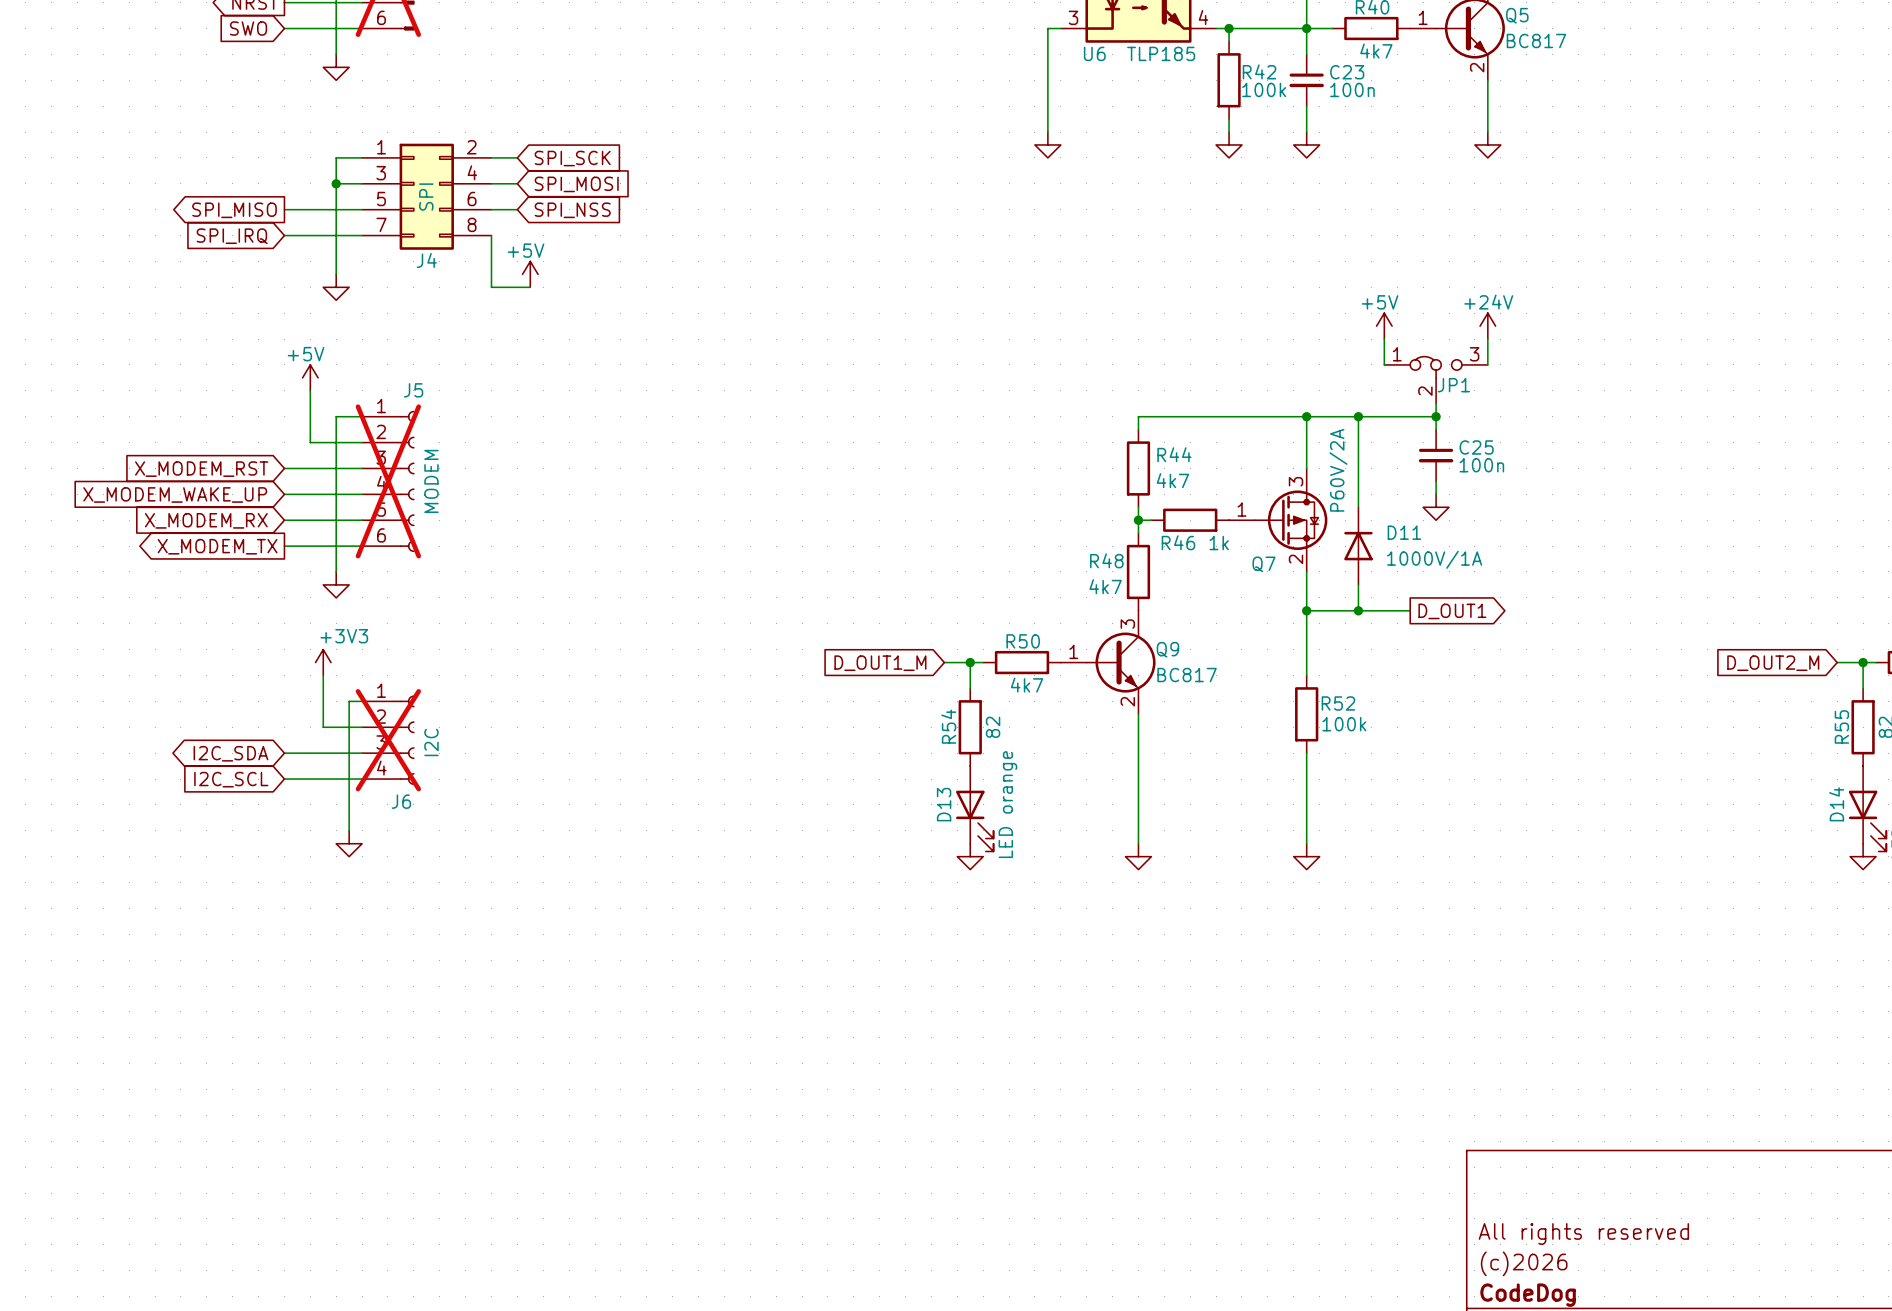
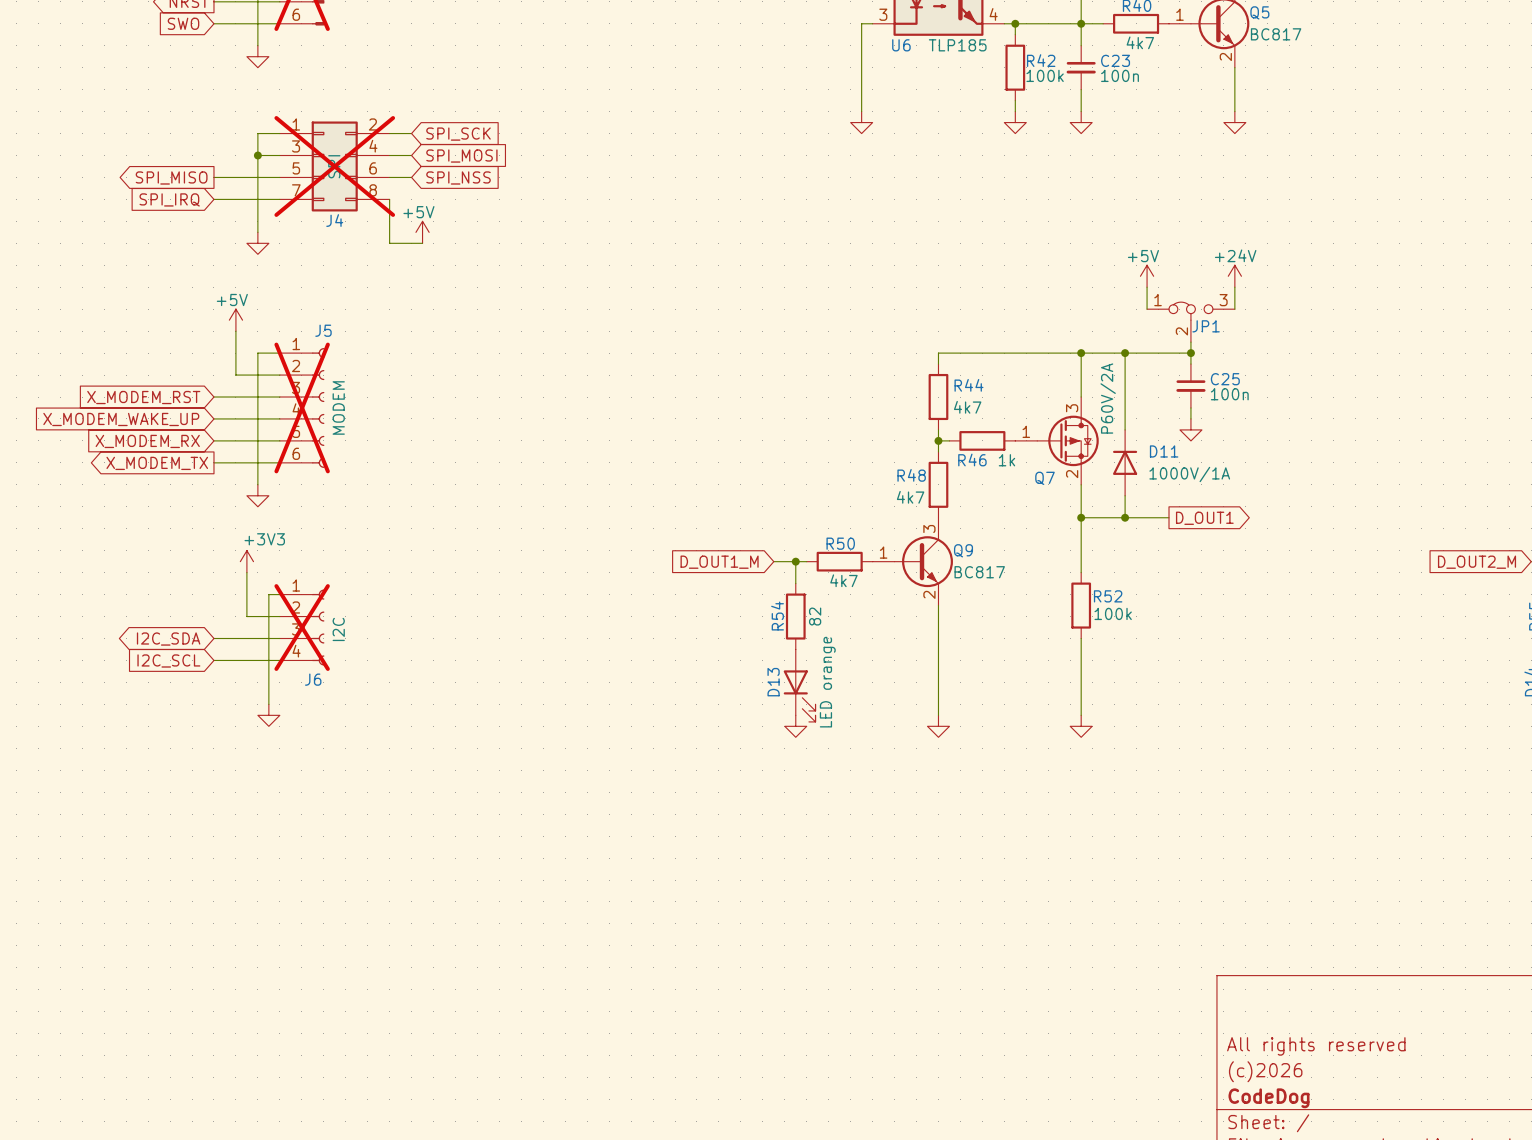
J4 do-not-place cross: none -> (334, 166)

